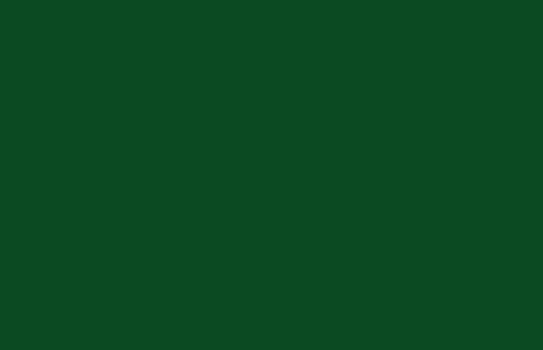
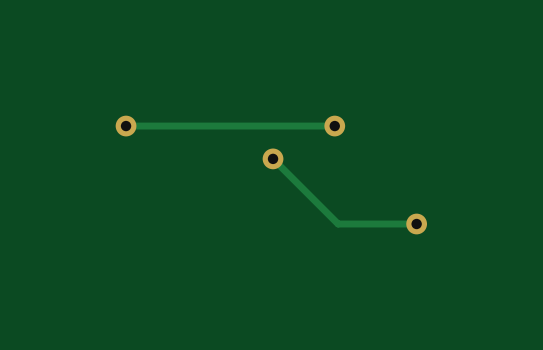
via: none -> (126, 126)
track: none -> (334, 126) (126, 126)
via: none -> (334, 126)
track: none -> (273, 158) (338, 224) (416, 224)
via: none -> (273, 158)
via: none -> (416, 224)

